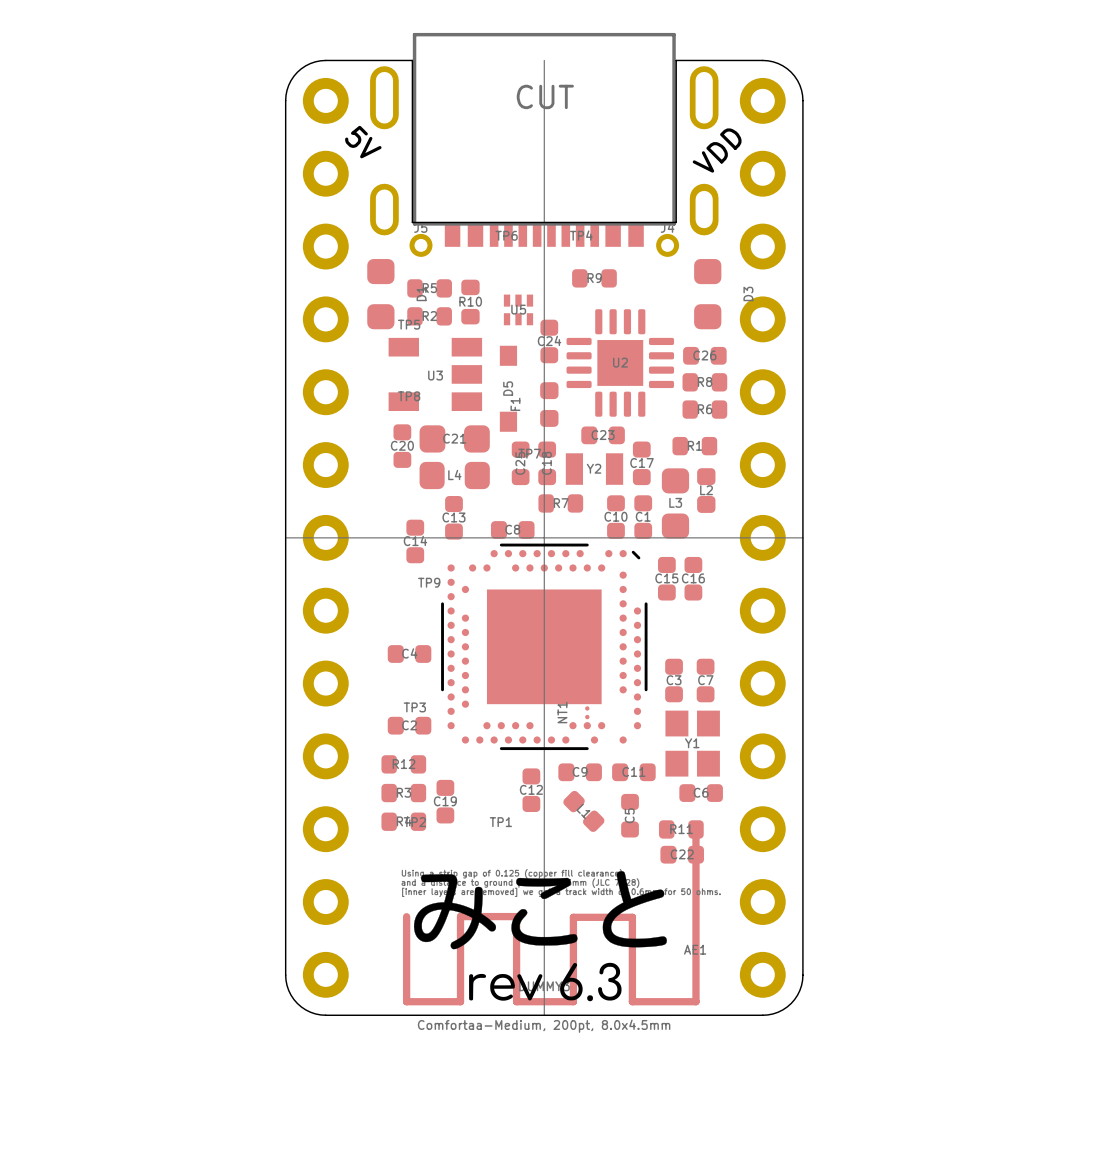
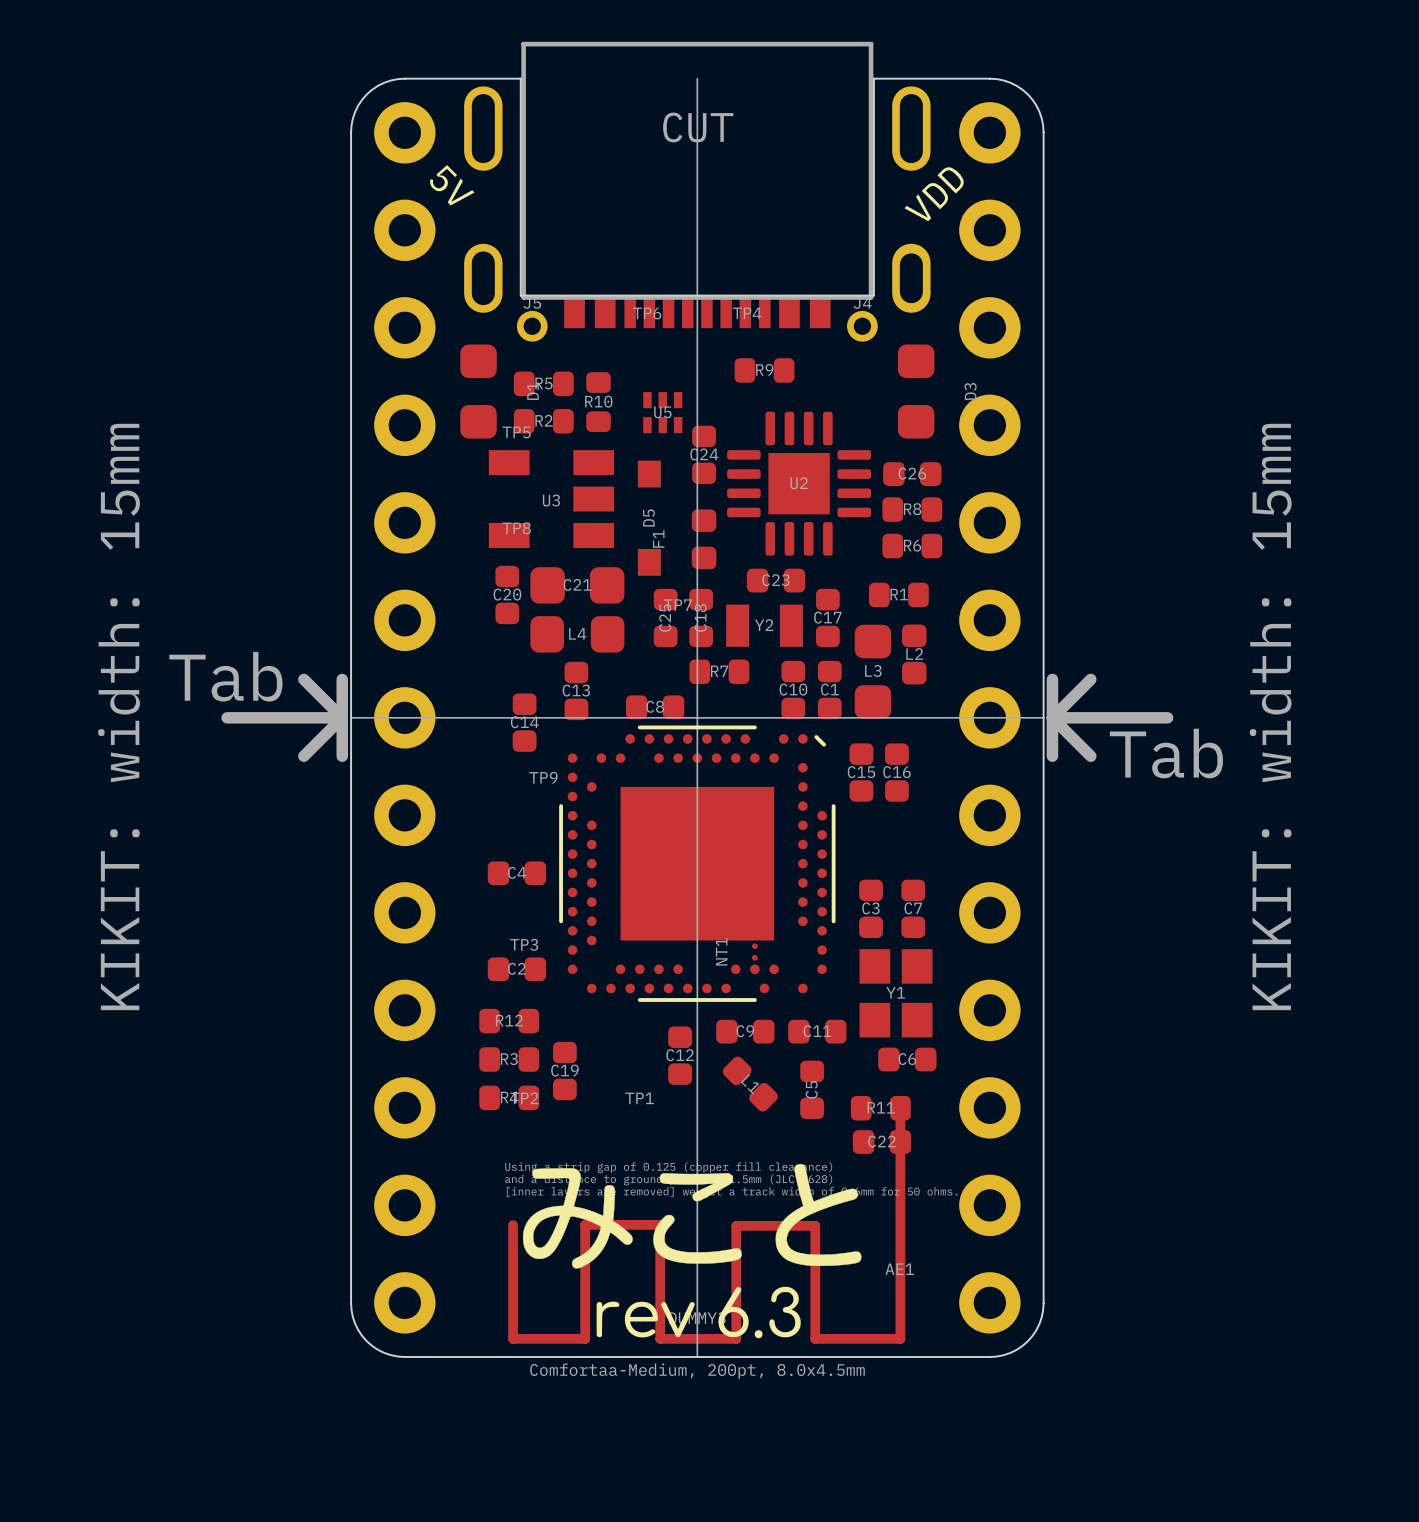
drawing: none -> [221, 673, 349, 762]
drawing: none -> [1046, 673, 1174, 762]

